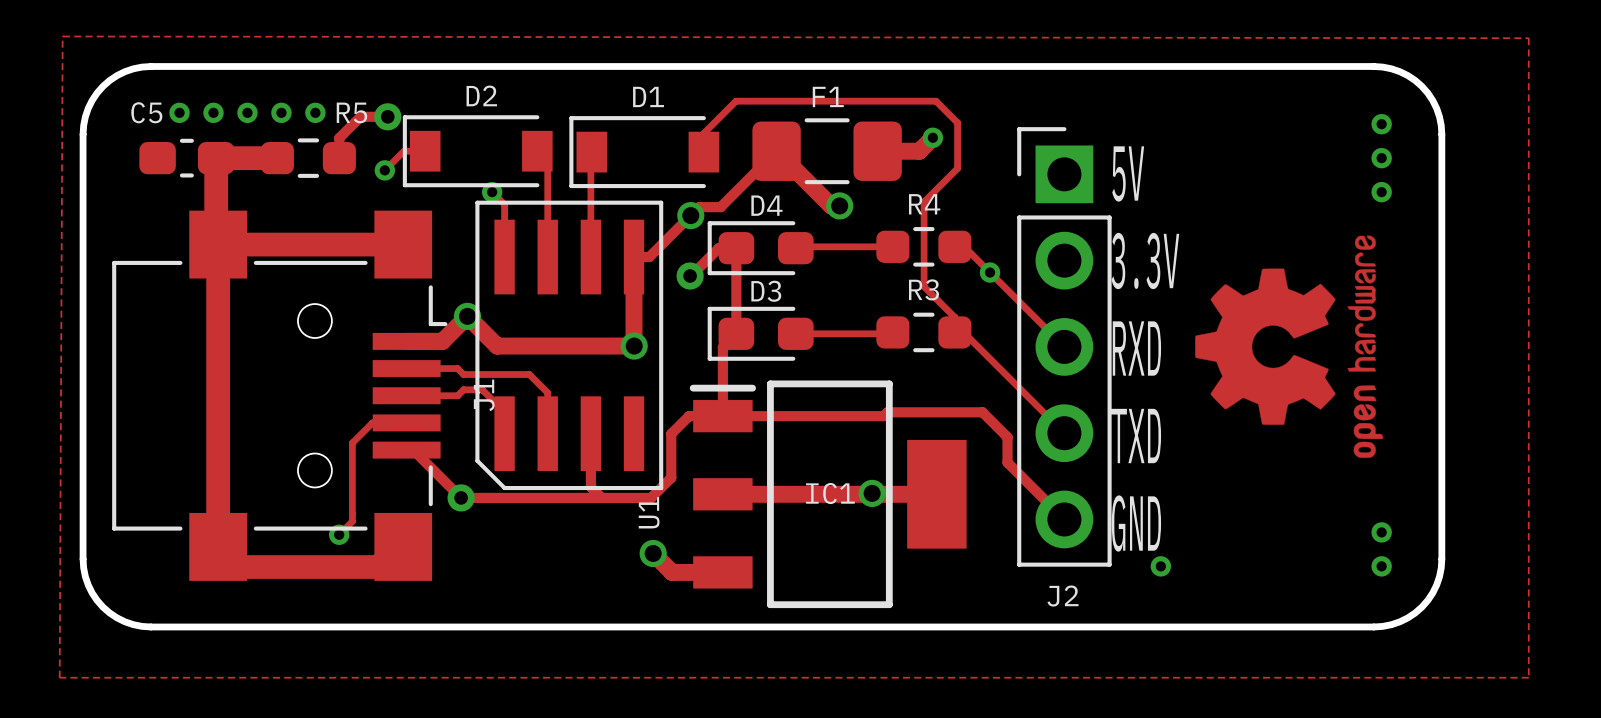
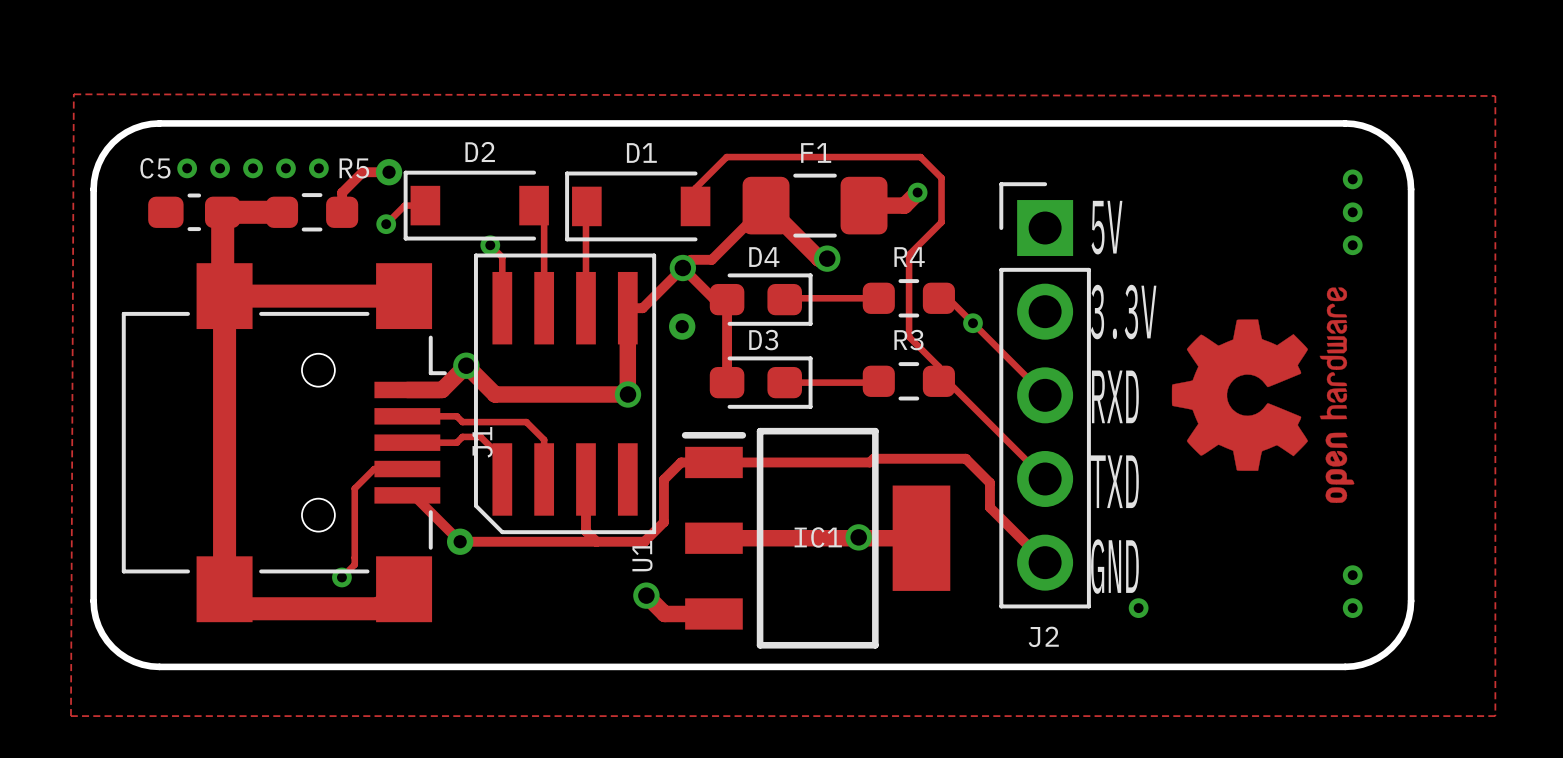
track: (723, 248) (718, 248) (690, 276) -> (714, 299) (682, 268)
D4 rotation: 0° (760, 248) -> 180° (761, 299)
track: (736, 333) (722, 347) (722, 416) -> none
D3 rotation: 0° (760, 333) -> 180° (761, 382)

